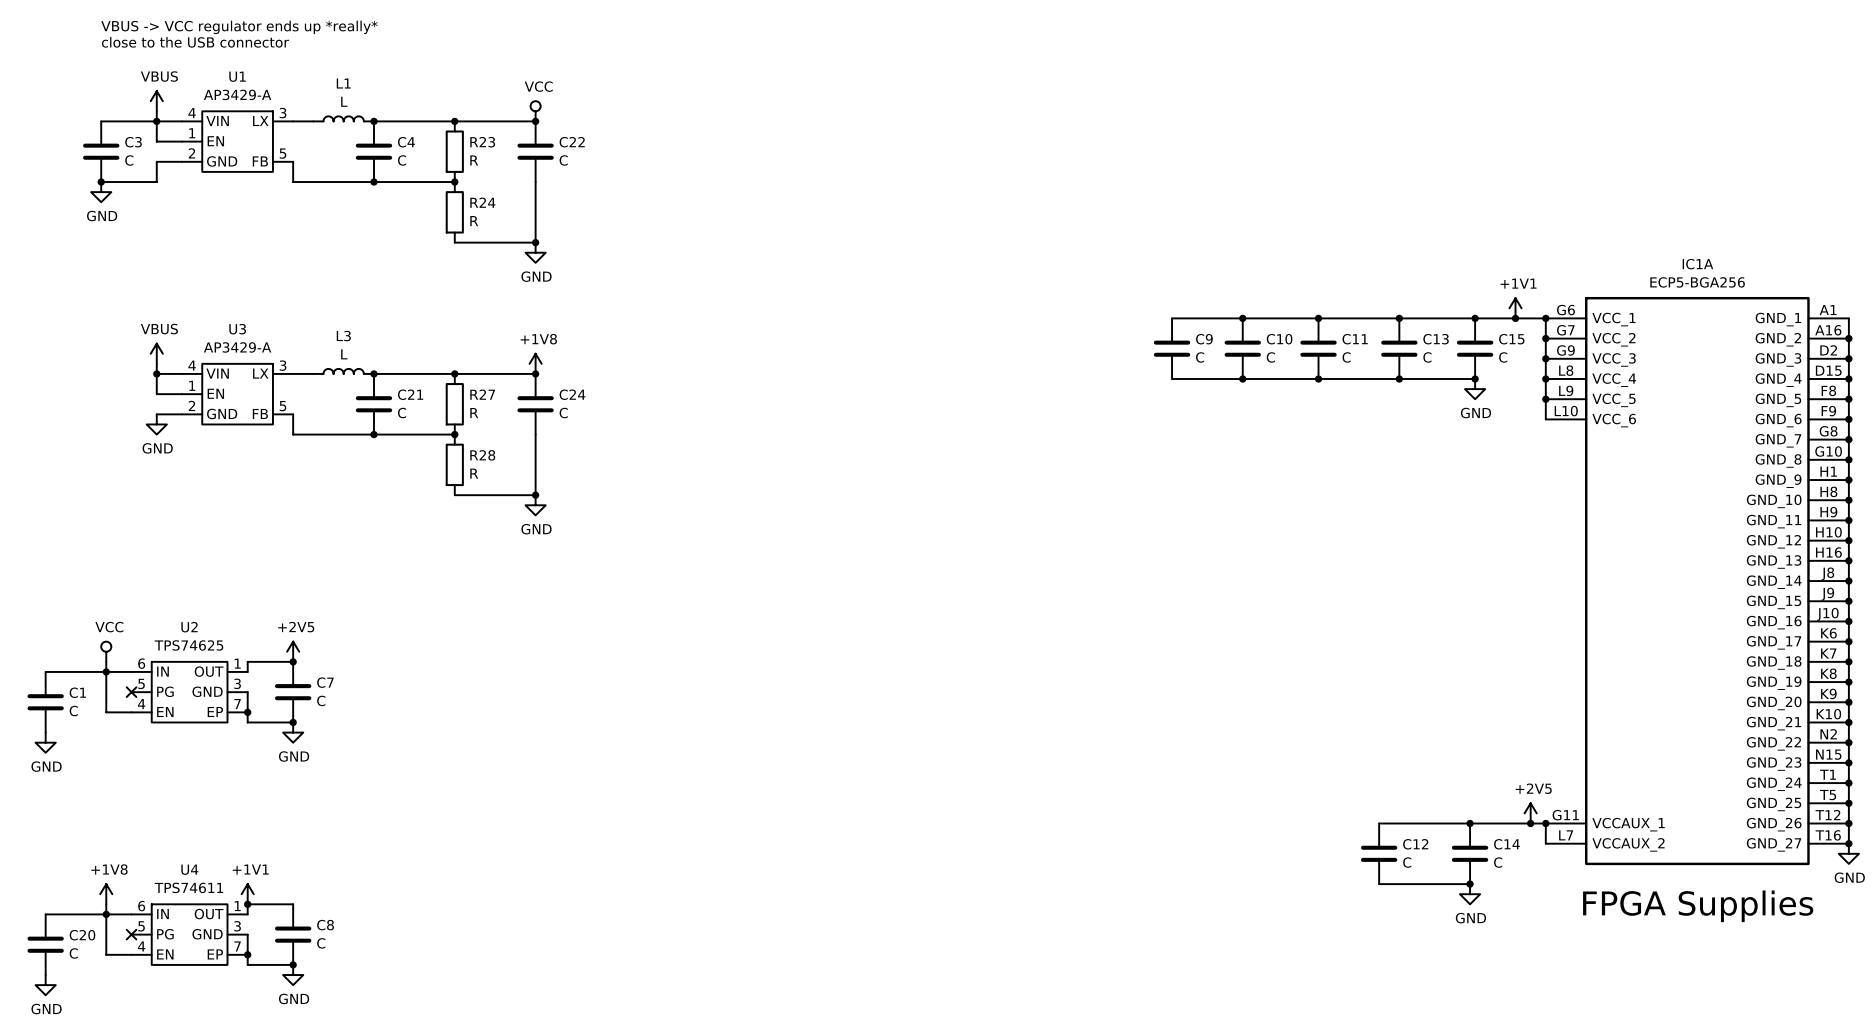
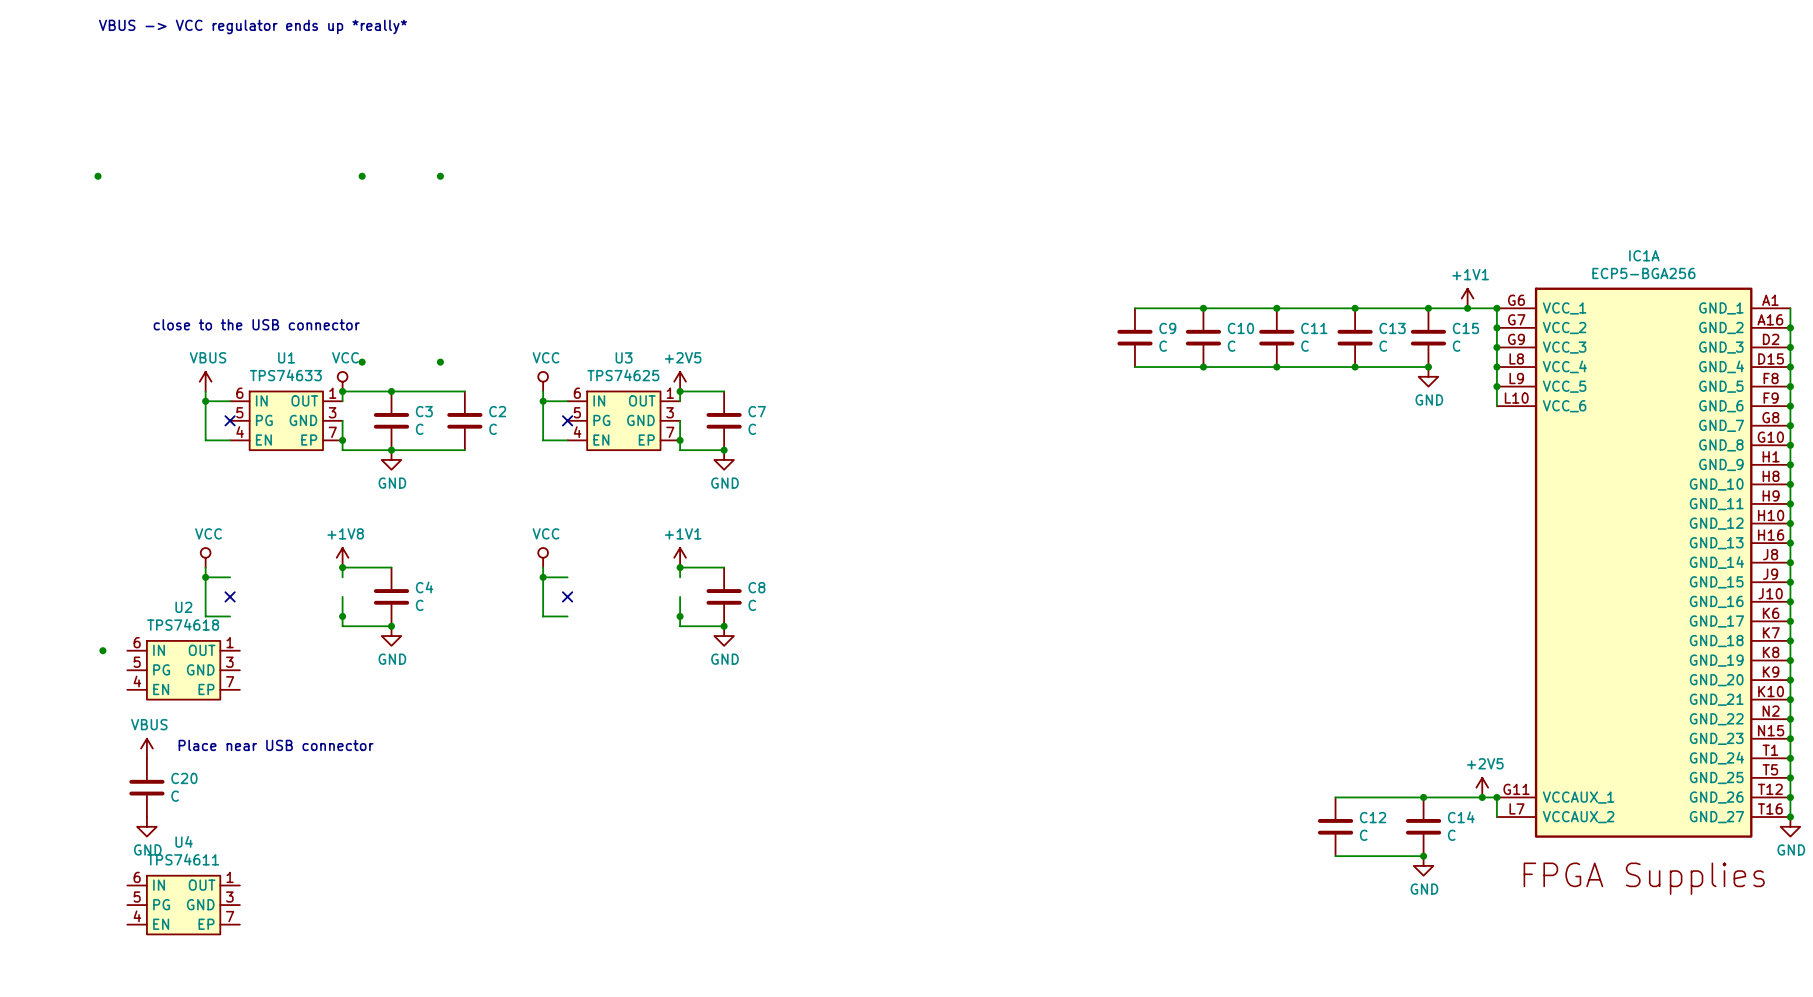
text: close to the USB connector (195, 42) -> none
U1 value: AP3429-A (237, 94) -> TPS74633 (285, 375)
power symbol: VBUS (156, 101) -> none
wire: (156, 111) (156, 141) (182, 141) -> none
U1 symbol: [182, 111, 294, 172] -> [230, 390, 343, 451]
power symbol: VCC (535, 111) -> none
L1: L (343, 118) -> none
wire: (101, 121) (182, 121) -> none
junction: (156, 121) -> none
wire: (293, 121) (313, 121) -> none
wire: (373, 121) (535, 121) -> none
junction: (373, 121) -> none
junction: (454, 121) -> none
junction: (535, 121) -> none
C3 position: (101, 151) -> (391, 420)
C4 position: (373, 151) -> (391, 596)
R23: R (454, 151) -> none
C22: C (535, 151) -> none
wire: (182, 161) (156, 161) (156, 182) (101, 182) -> none
wire: (293, 161) (293, 182) (454, 182) -> none
wire: (535, 182) (535, 242) (454, 242) -> none
power symbol: GND (101, 192) -> none
R24: R (454, 212) -> none
junction: (535, 242) -> none
power symbol: GND (535, 252) -> none
text: none -> close to the USB connector (256, 324)
U3 value: AP3429-A (237, 347) -> TPS74625 (623, 375)
power symbol position: VBUS (156, 353) -> VBUS (205, 381)
wire: (156, 363) (156, 394) (182, 394) -> none
U3 symbol: [182, 363, 294, 425] -> [567, 390, 681, 451]
power symbol: +1V8 (535, 363) -> none
L3: L (343, 371) -> none
wire: (156, 373) (182, 373) -> none
junction: (156, 373) -> none
wire: (293, 373) (313, 373) -> none
wire: (373, 373) (535, 373) -> none
junction: (535, 373) -> none
power symbol: none -> VCC (342, 381)
power symbol: none -> VCC (543, 381)
power symbol: none -> +2V5 (680, 381)
wire: none -> (205, 391) (205, 440) (230, 440)
junction: none -> (342, 391)
C21: C (373, 404) -> none
junction: none -> (391, 391)
R27: R (454, 404) -> none
wire: none -> (464, 391) (342, 391) (342, 401)
C24: C (535, 404) -> none
wire: none -> (543, 391) (543, 440) (567, 440)
junction: none -> (680, 391)
wire: none -> (724, 391) (680, 391) (680, 401)
wire: (156, 414) (182, 414) -> (205, 401) (230, 401)
junction: none -> (205, 401)
wire: (293, 414) (293, 434) (454, 434) -> none
wire: none -> (543, 401) (567, 401)
junction: none -> (543, 401)
power symbol: GND (156, 424) -> none
no-connect mark: none -> (230, 420)
wire: none -> (342, 420) (342, 450) (464, 450)
junction: (373, 434) -> none
junction: (454, 434) -> none
C2: none -> C (464, 420)
wire: (535, 434) (535, 495) (454, 495) -> none
no-connect mark: none -> (567, 420)
wire: none -> (680, 420) (680, 450) (724, 450)
junction: none -> (342, 440)
junction: none -> (680, 440)
junction: none -> (391, 450)
R28: R (454, 464) -> none
junction: none -> (724, 450)
power symbol: none -> GND (391, 459)
power symbol: none -> GND (724, 459)
junction: (535, 495) -> none
power symbol: GND (535, 505) -> none
power symbol: none -> +1V8 (342, 557)
power symbol: none -> VCC (543, 557)
power symbol: none -> +1V1 (680, 557)
junction: none -> (342, 567)
wire: none -> (391, 567) (342, 567) (342, 577)
wire: none -> (543, 567) (543, 616) (567, 616)
junction: none -> (680, 567)
wire: none -> (724, 567) (680, 567) (680, 577)
wire: none -> (205, 577) (230, 577)
junction: none -> (205, 577)
wire: none -> (543, 577) (567, 577)
junction: none -> (543, 577)
no-connect mark: none -> (230, 596)
wire: none -> (342, 596) (342, 626) (391, 626)
no-connect mark: none -> (567, 596)
wire: none -> (680, 596) (680, 626) (724, 626)
junction: none -> (342, 616)
junction: none -> (680, 616)
U2 value: TPS74625 (188, 645) -> TPS74618 (183, 624)
junction: none -> (391, 626)
junction: none -> (724, 626)
power symbol position: VCC (106, 651) -> VCC (205, 557)
power symbol: +2V5 (293, 651) -> none
power symbol: none -> GND (391, 636)
power symbol: none -> GND (724, 636)
wire: (106, 661) (106, 712) (131, 712) -> (205, 567) (205, 616) (230, 616)
wire: (293, 661) (247, 661) (247, 671) -> none
junction: (293, 661) -> none
wire: (45, 671) (131, 671) -> none
no-connect mark: (131, 692) -> none
wire: (247, 692) (247, 722) (293, 722) -> none
C7 position: (293, 692) -> (724, 420)
C1: C (45, 702) -> none
junction: (247, 712) -> none
junction: (293, 722) -> none
power symbol: GND (293, 732) -> none
power symbol: GND (45, 742) -> none
text: none -> Place near USB connector (276, 745)
power symbol: none -> VBUS (146, 748)
power symbol: none -> GND (146, 826)
power symbol: +1V8 (106, 894) -> none
power symbol: +1V1 (247, 894) -> none
wire: (106, 904) (106, 954) (131, 954) -> none
junction: (247, 904) -> none
wire: (293, 904) (247, 904) (247, 914) -> none
wire: (45, 914) (131, 914) -> none
junction: (106, 914) -> none
no-connect mark: (131, 934) -> none
wire: (247, 934) (247, 964) (293, 964) -> none
C8 position: (293, 934) -> (724, 596)
C20 position: (45, 944) -> (146, 787)
junction: (247, 954) -> none
junction: (293, 964) -> none
power symbol: GND (293, 975) -> none
power symbol: GND (45, 985) -> none

